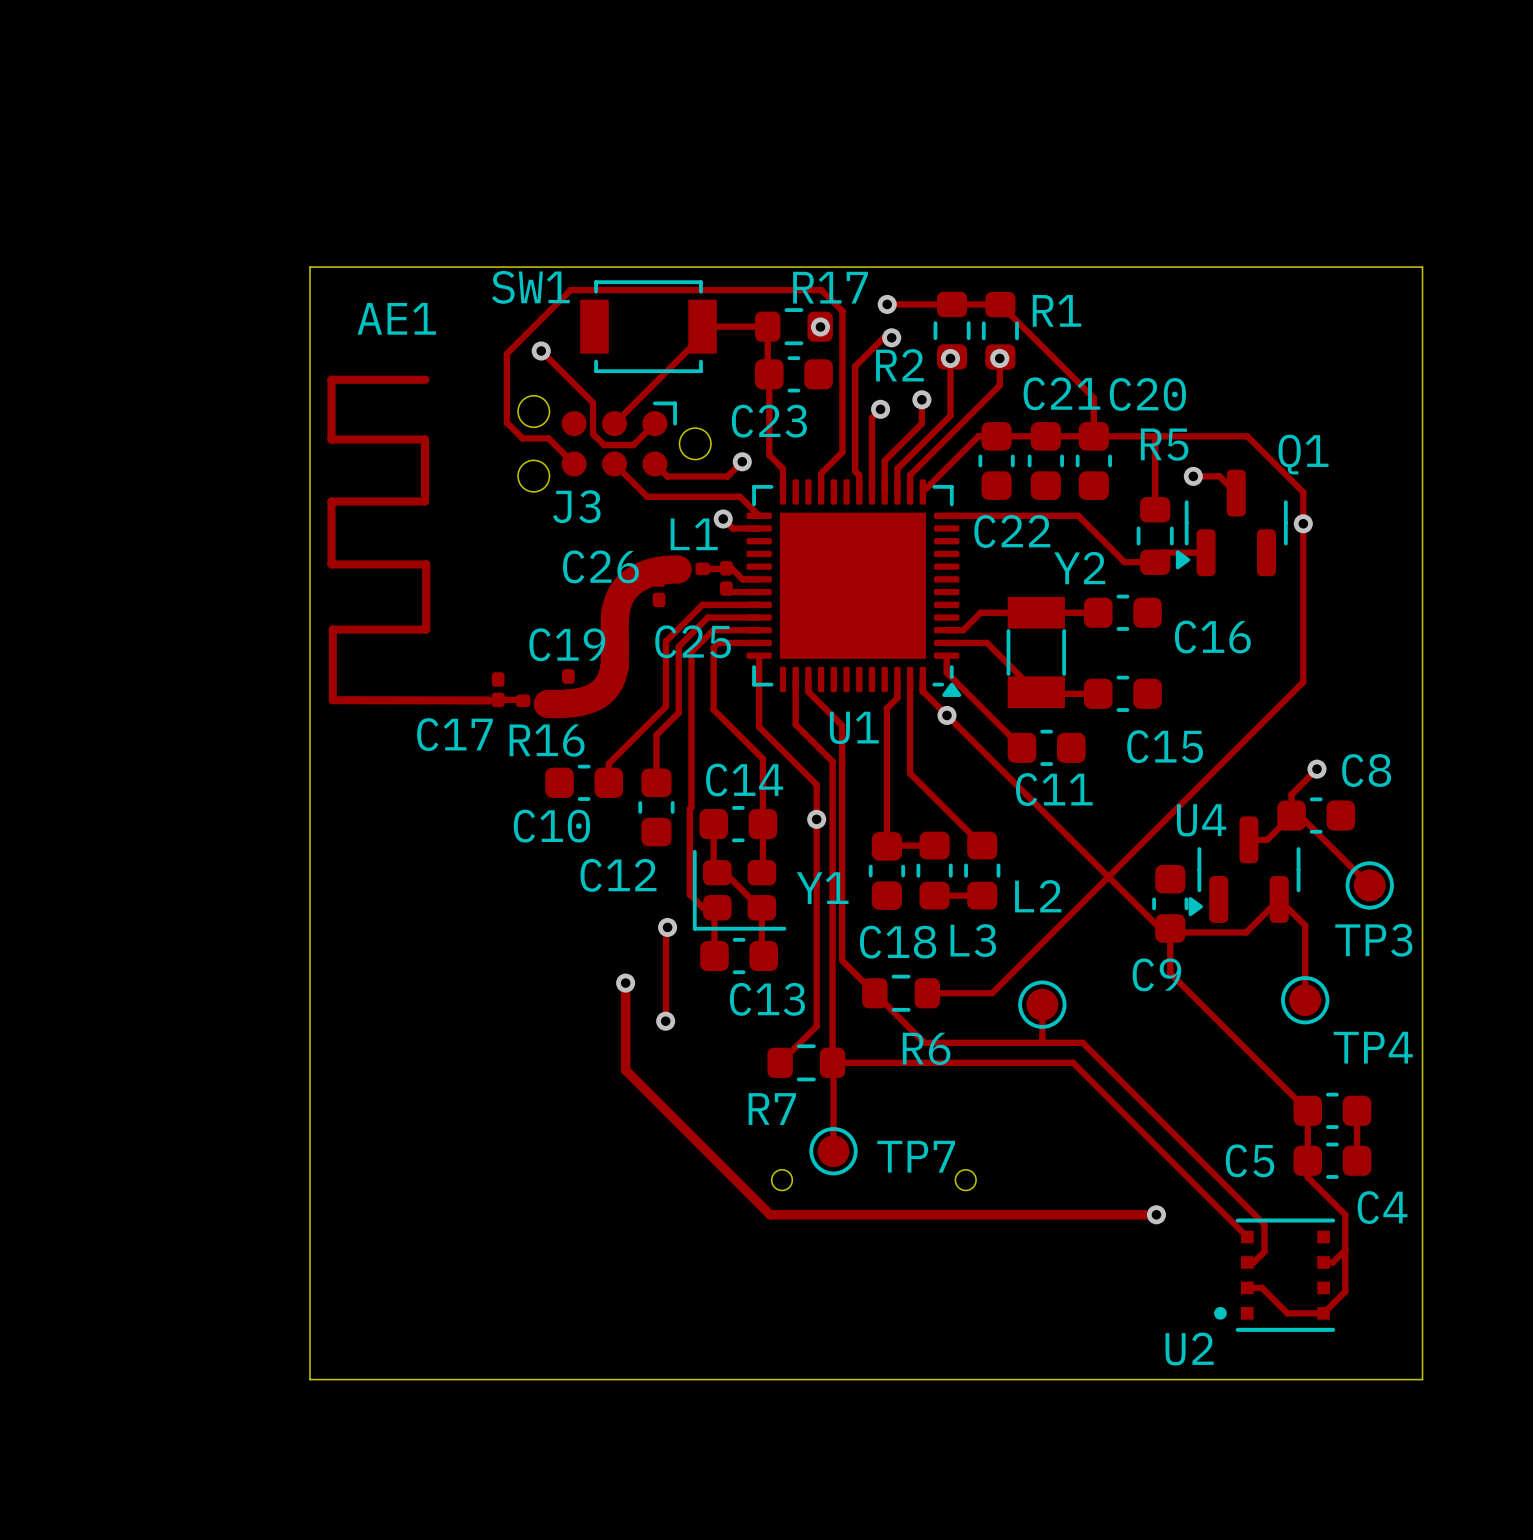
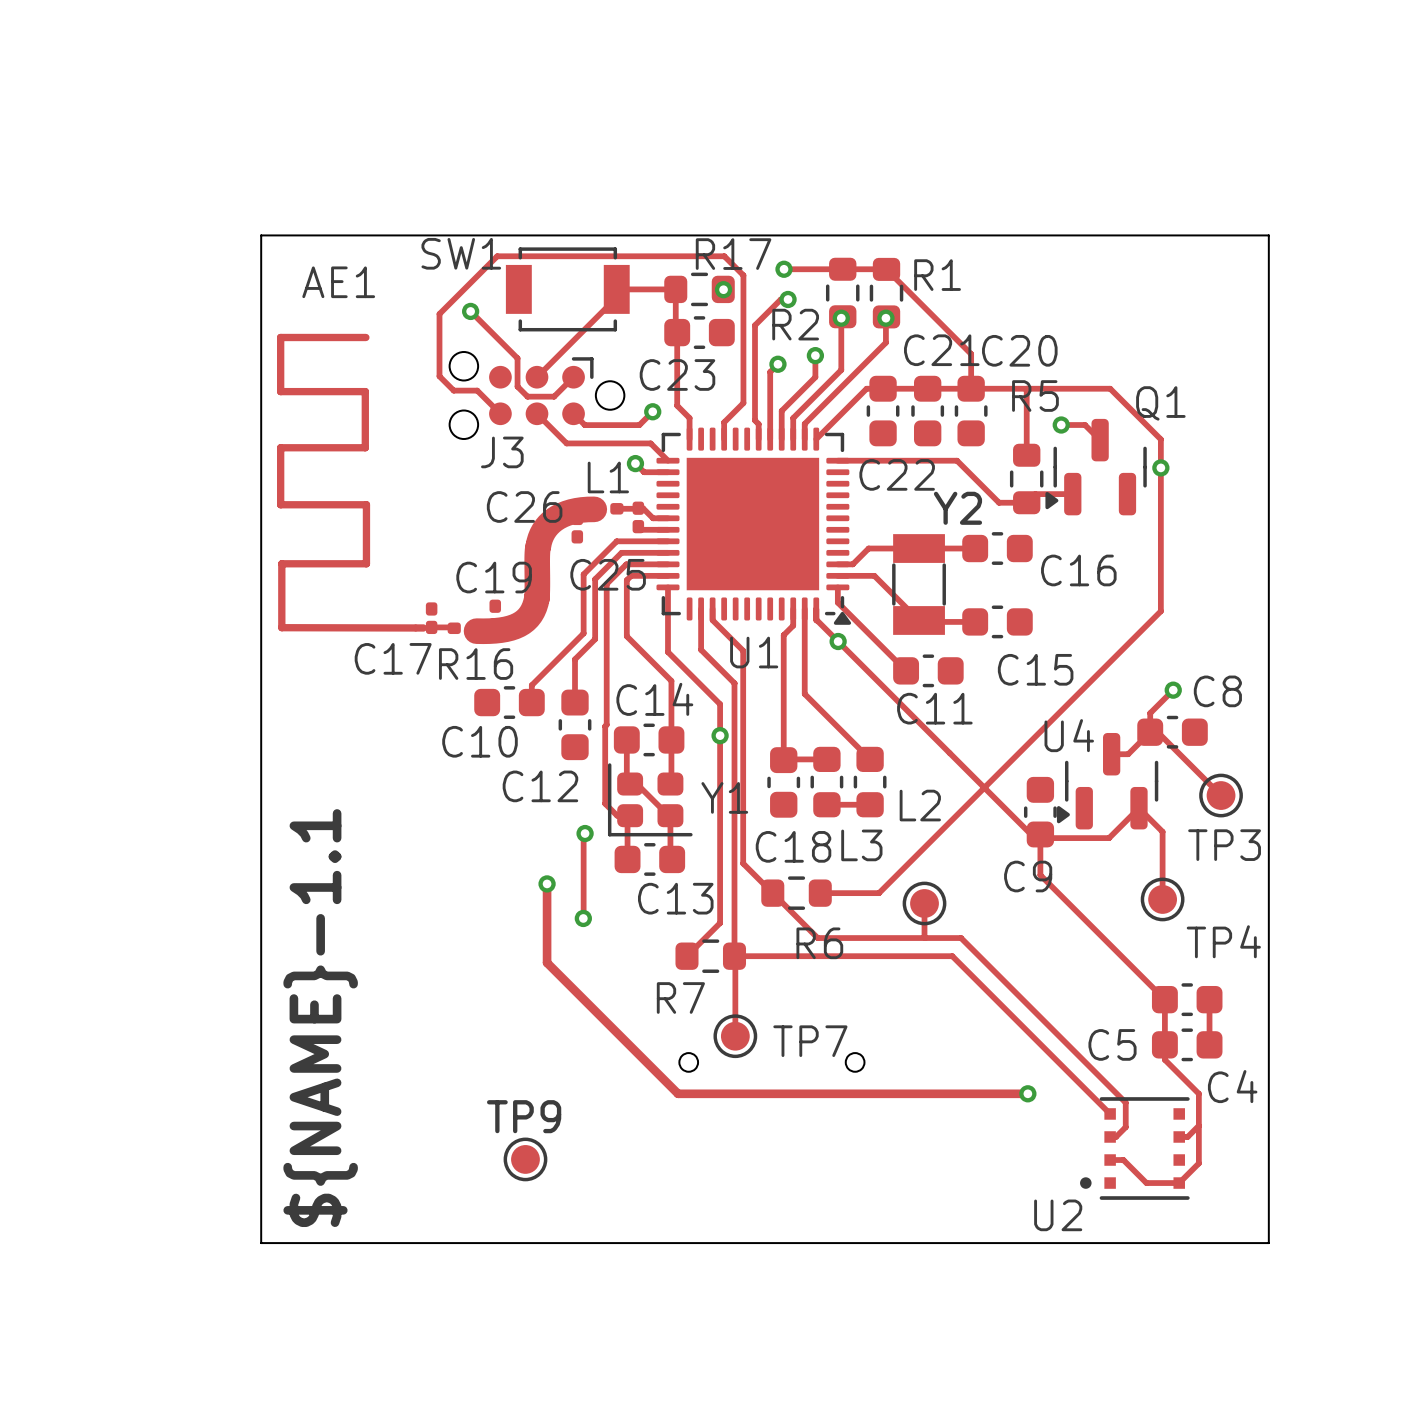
text: none -> ${NAME}-1.1 (320, 1018)
TP9: none -> (525, 1159)

